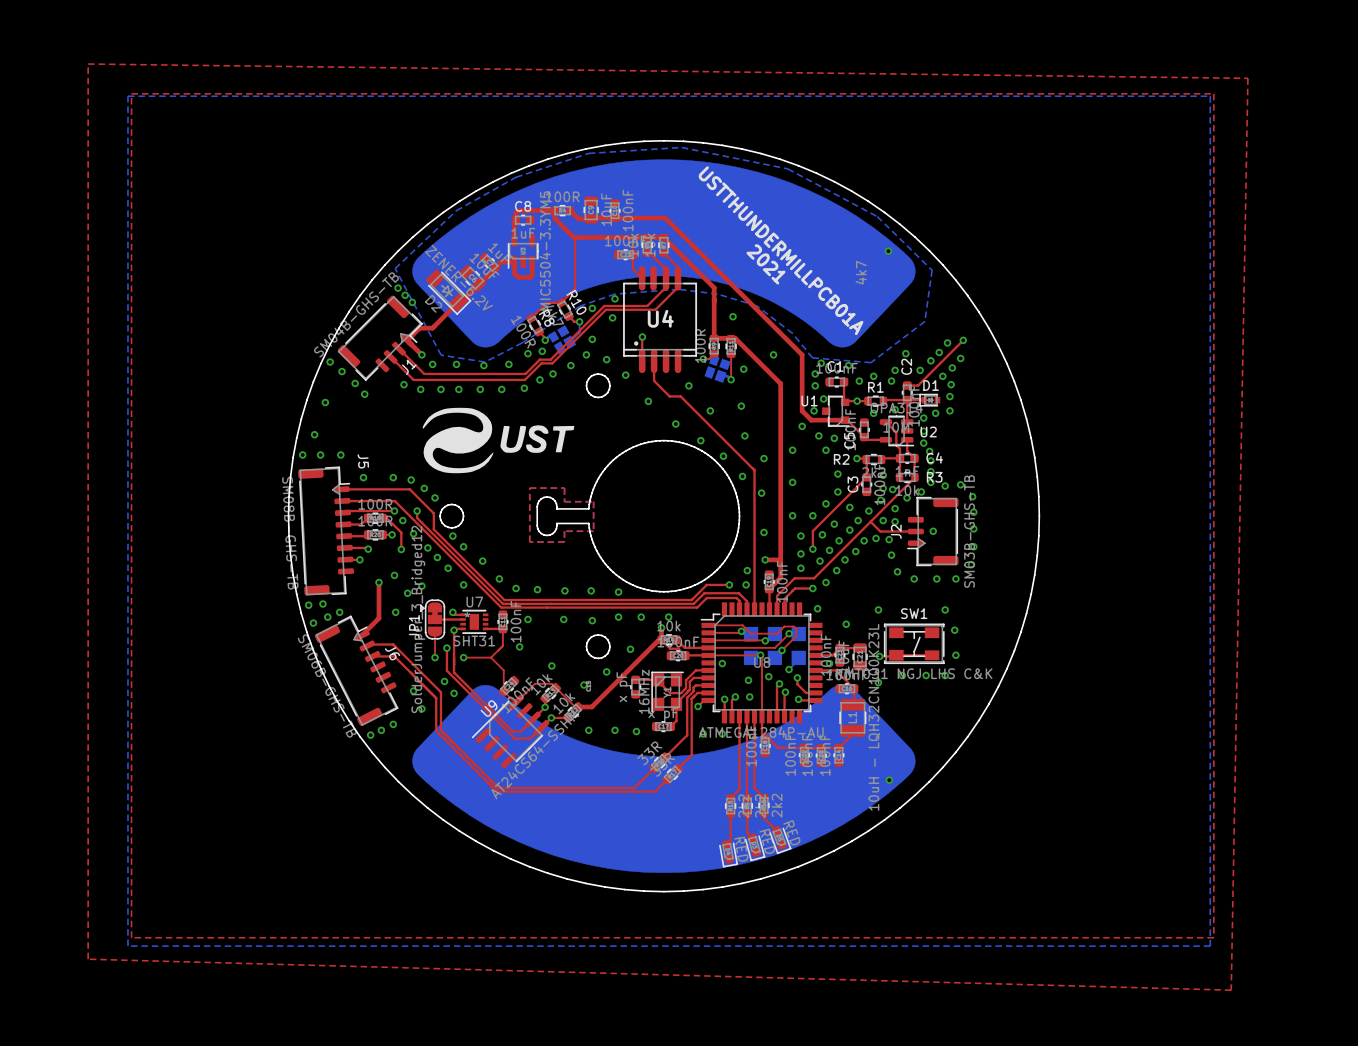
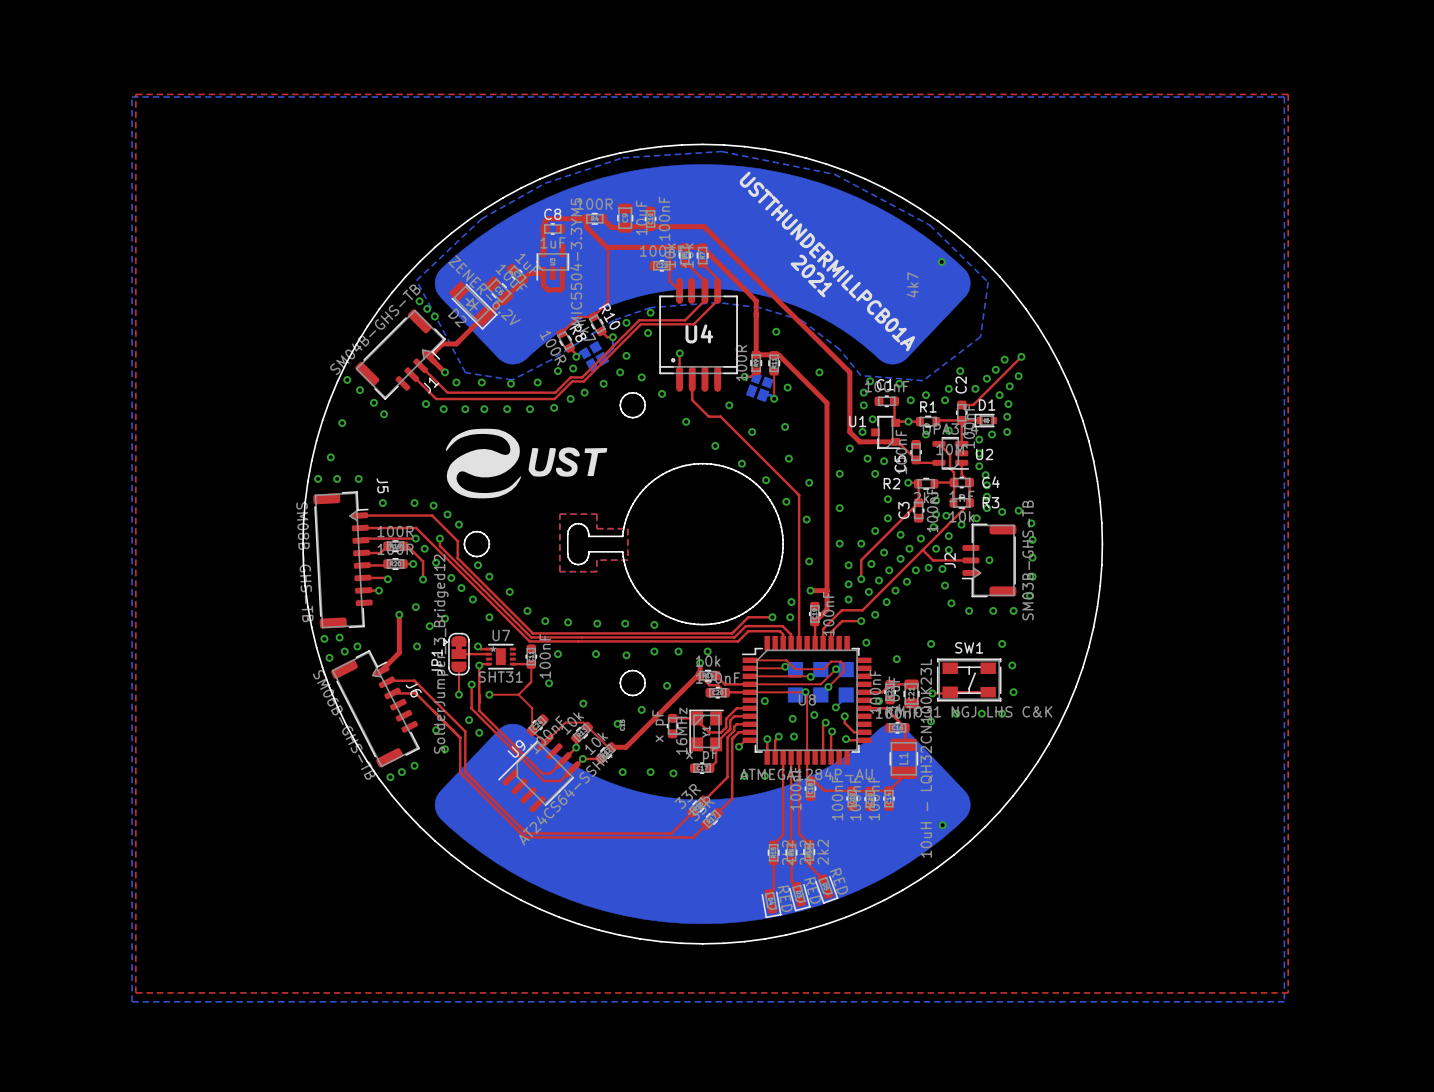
top zone outline: (88, 64) (88, 959) (1231, 990) (1247, 78) (88, 64) -> none

